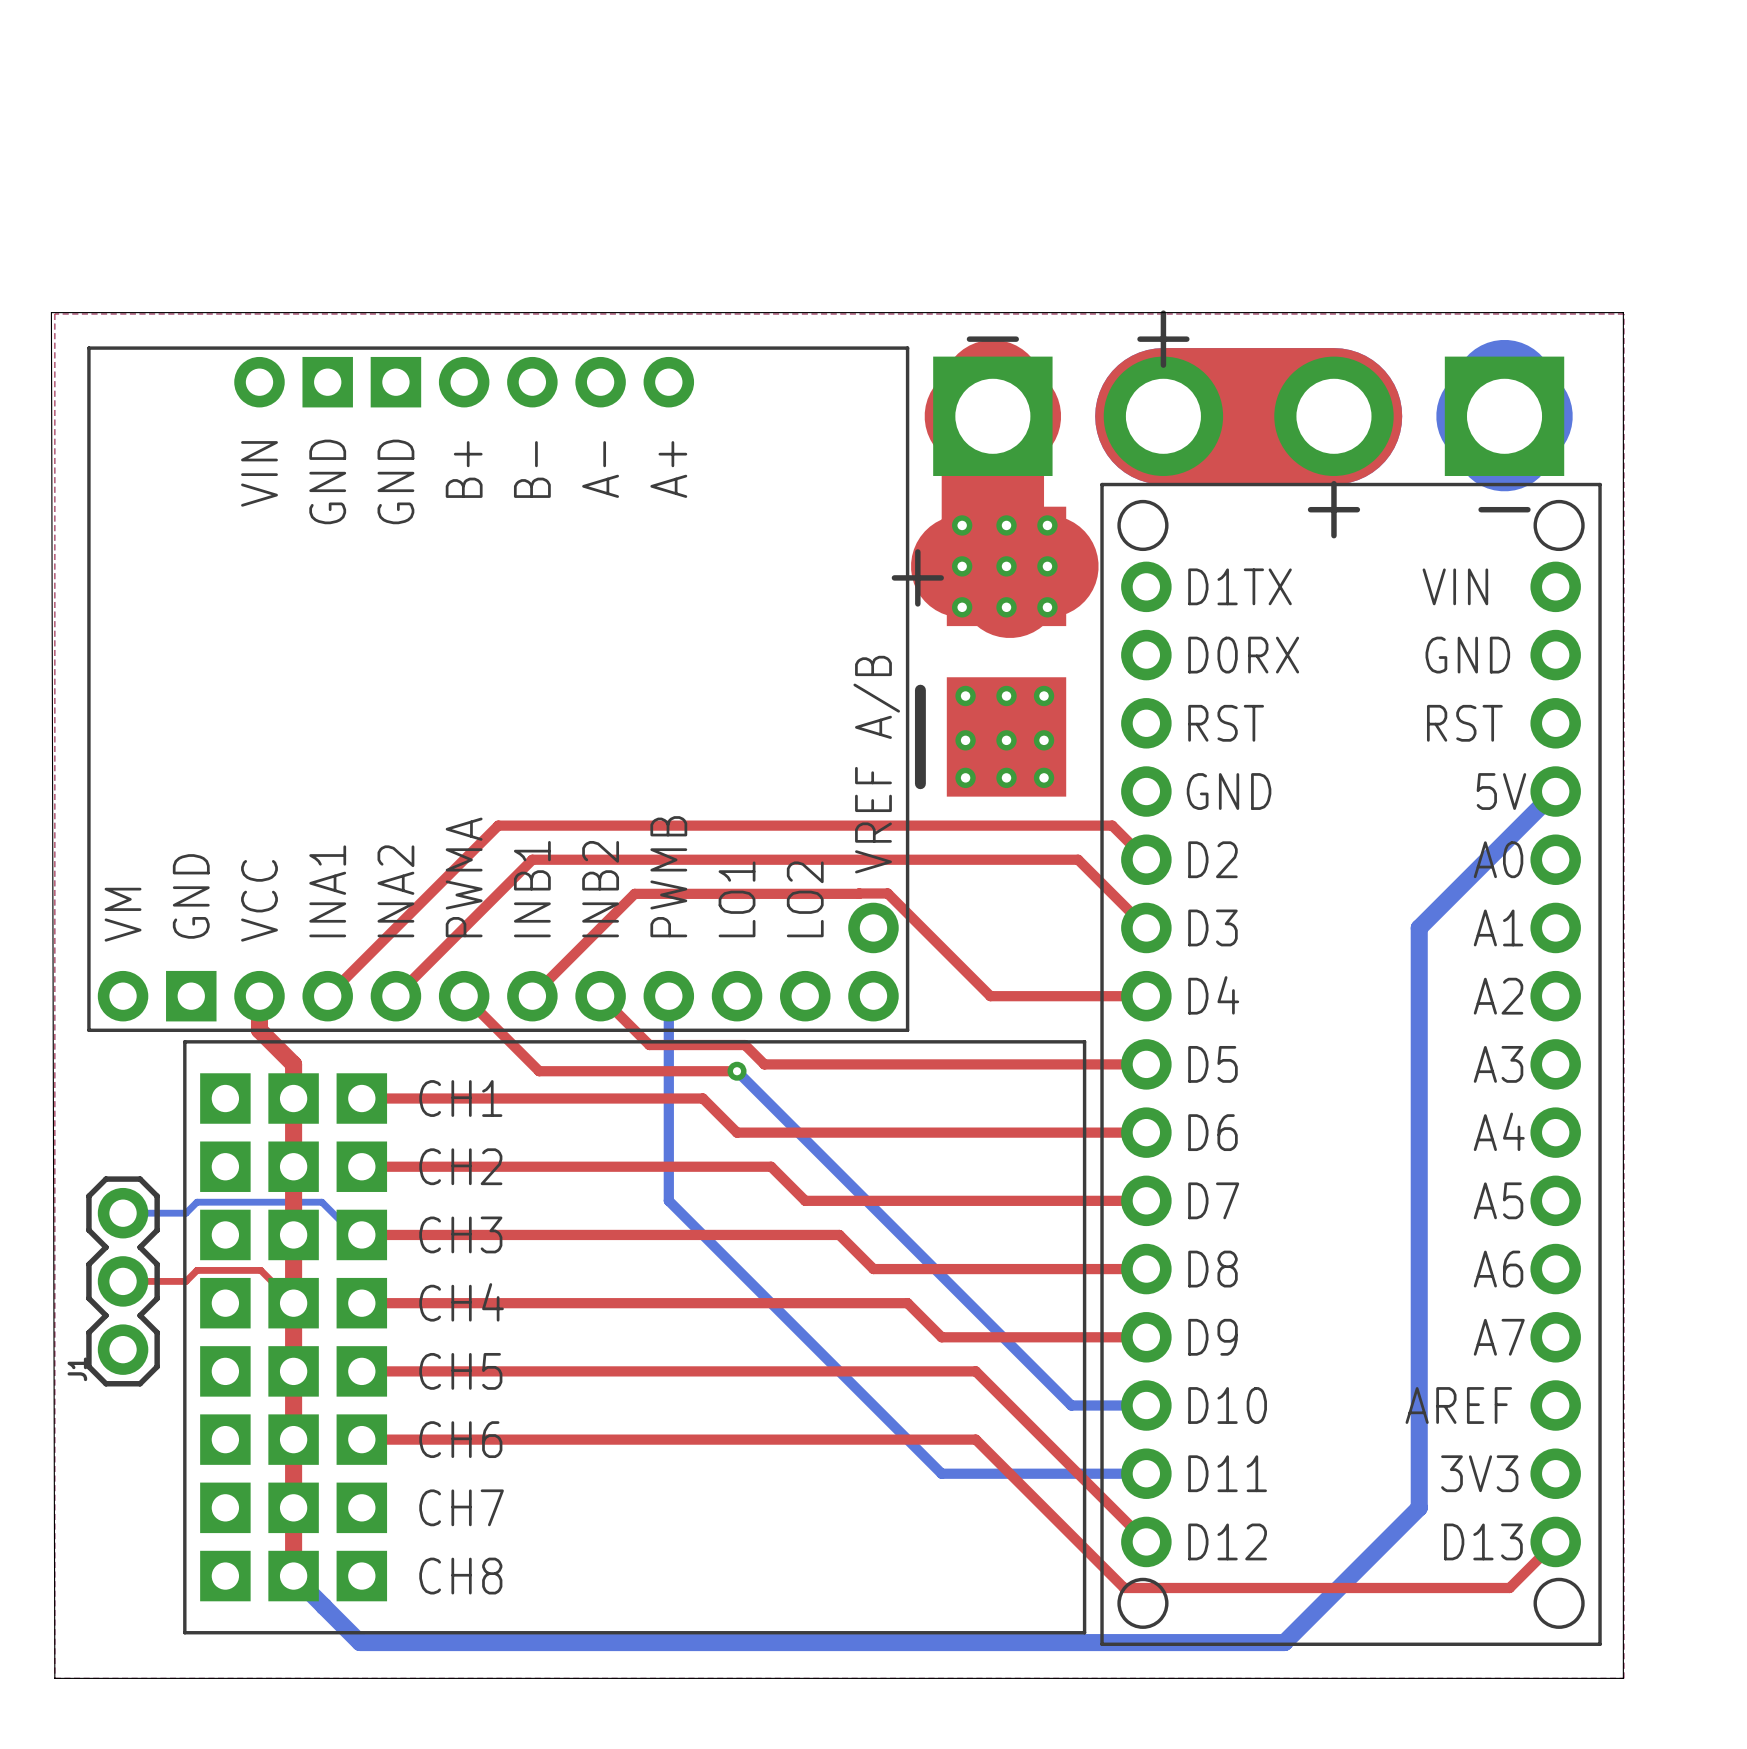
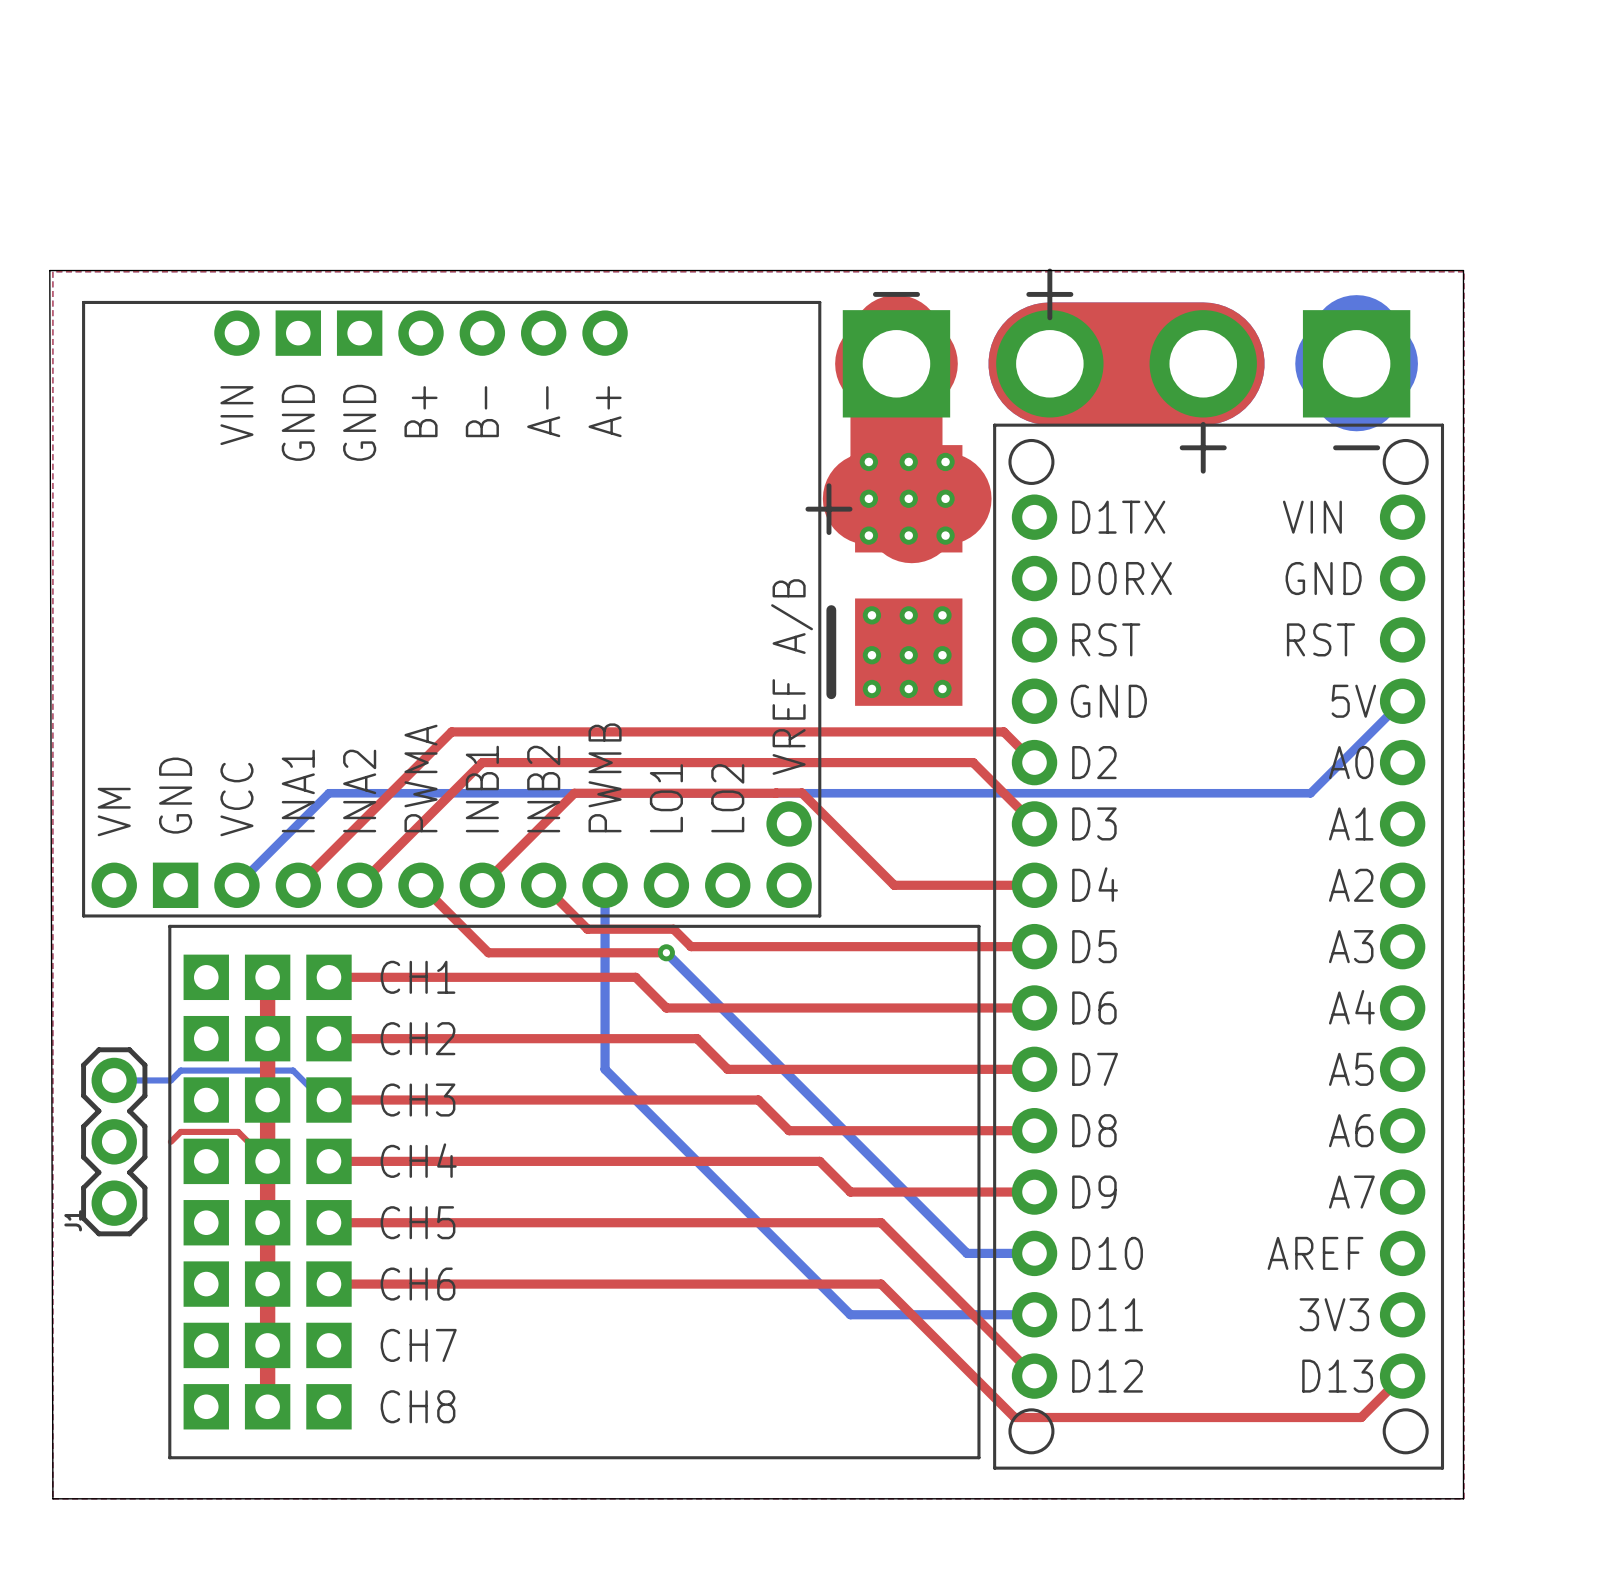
bottom track width: thick (1555, 791) (1453, 893) -> thin (1402, 701) (1310, 793)
bottom track: (1453, 893) (1419, 927) (1419, 1507) (1284, 1642) (360, 1642) (293, 1576) -> (1310, 793) (328, 793) (236, 885)
top track: (259, 996) (259, 1030) (293, 1064) (293, 1098) -> none
top track: (123, 1281) (186, 1281) -> none

